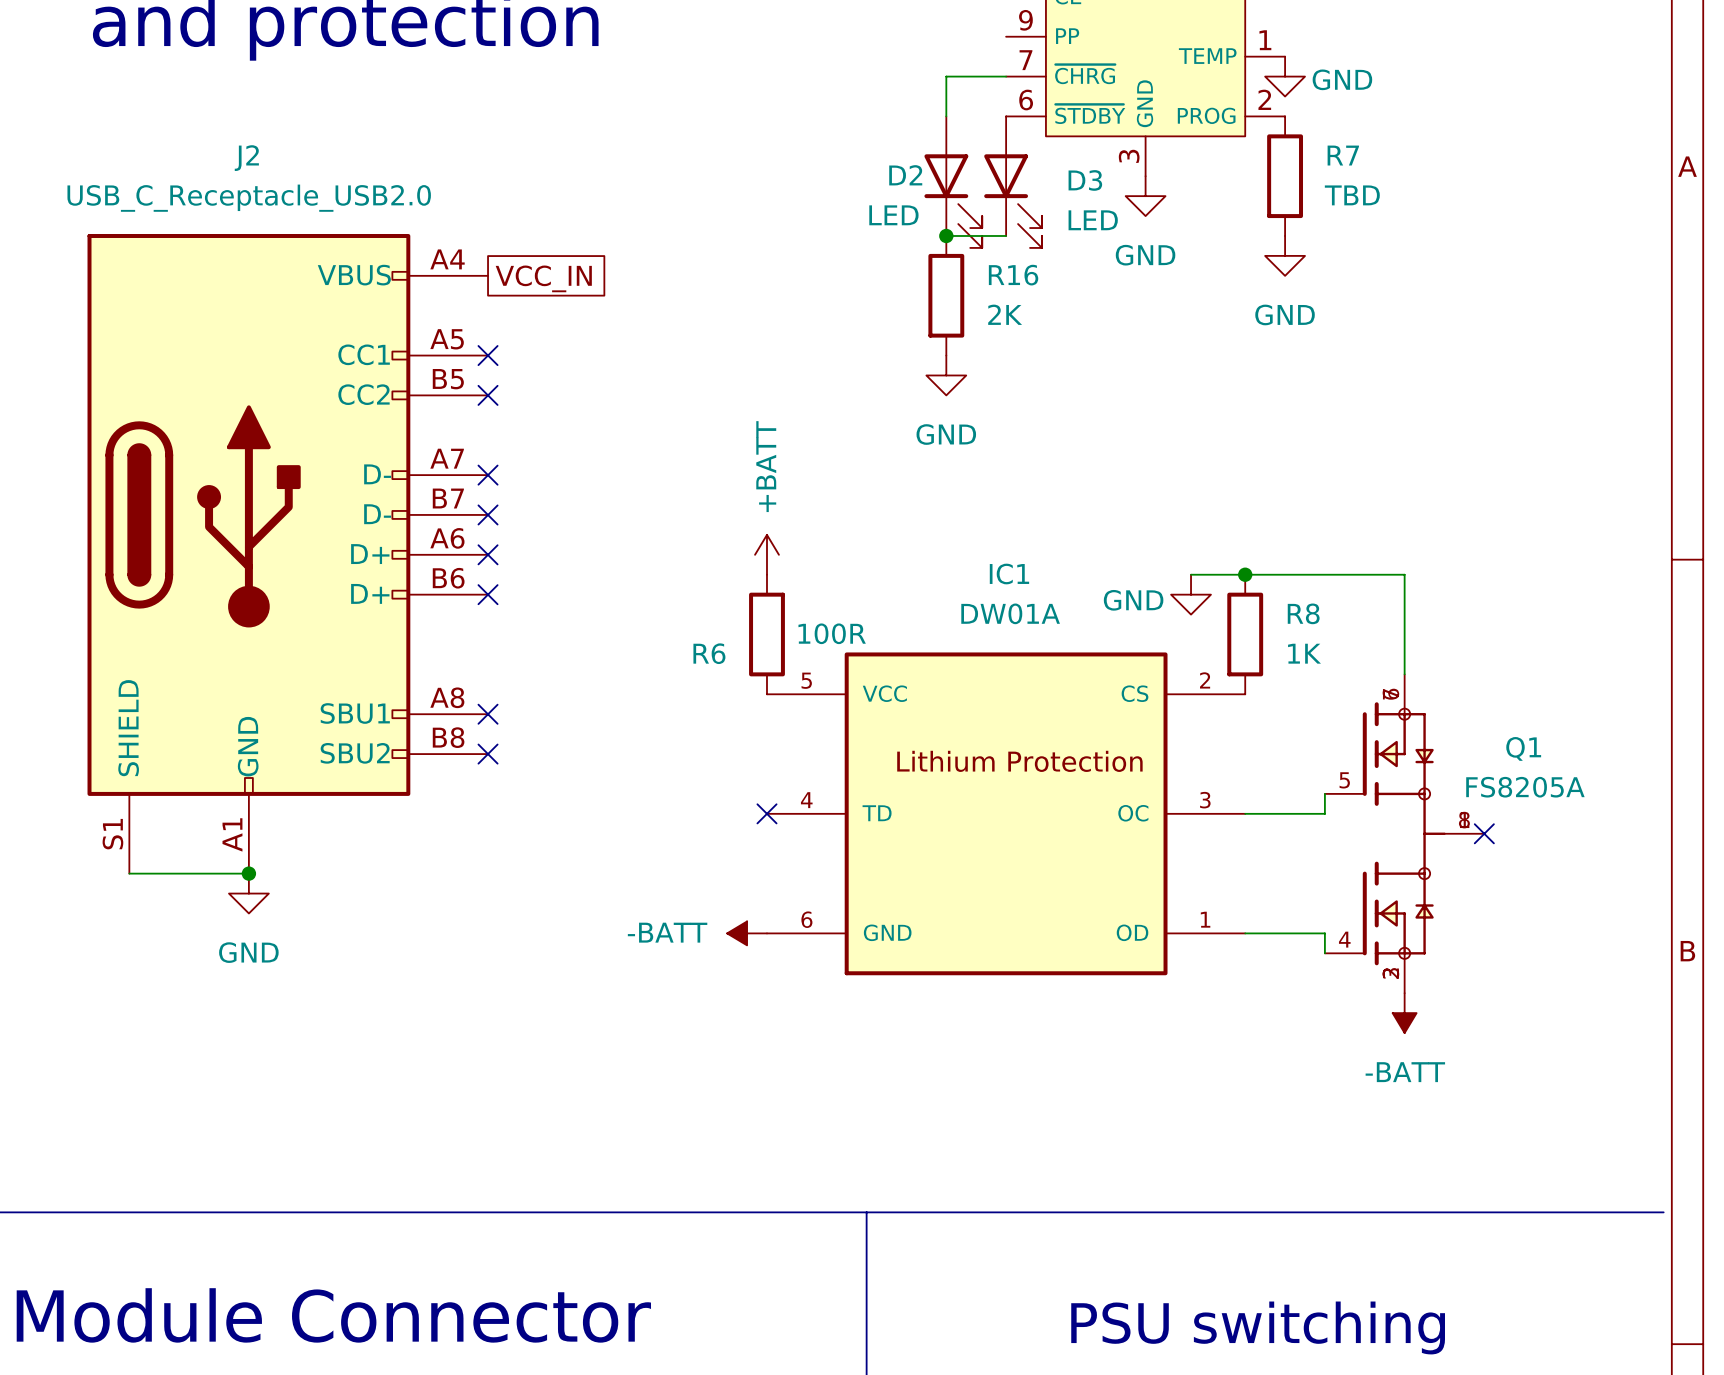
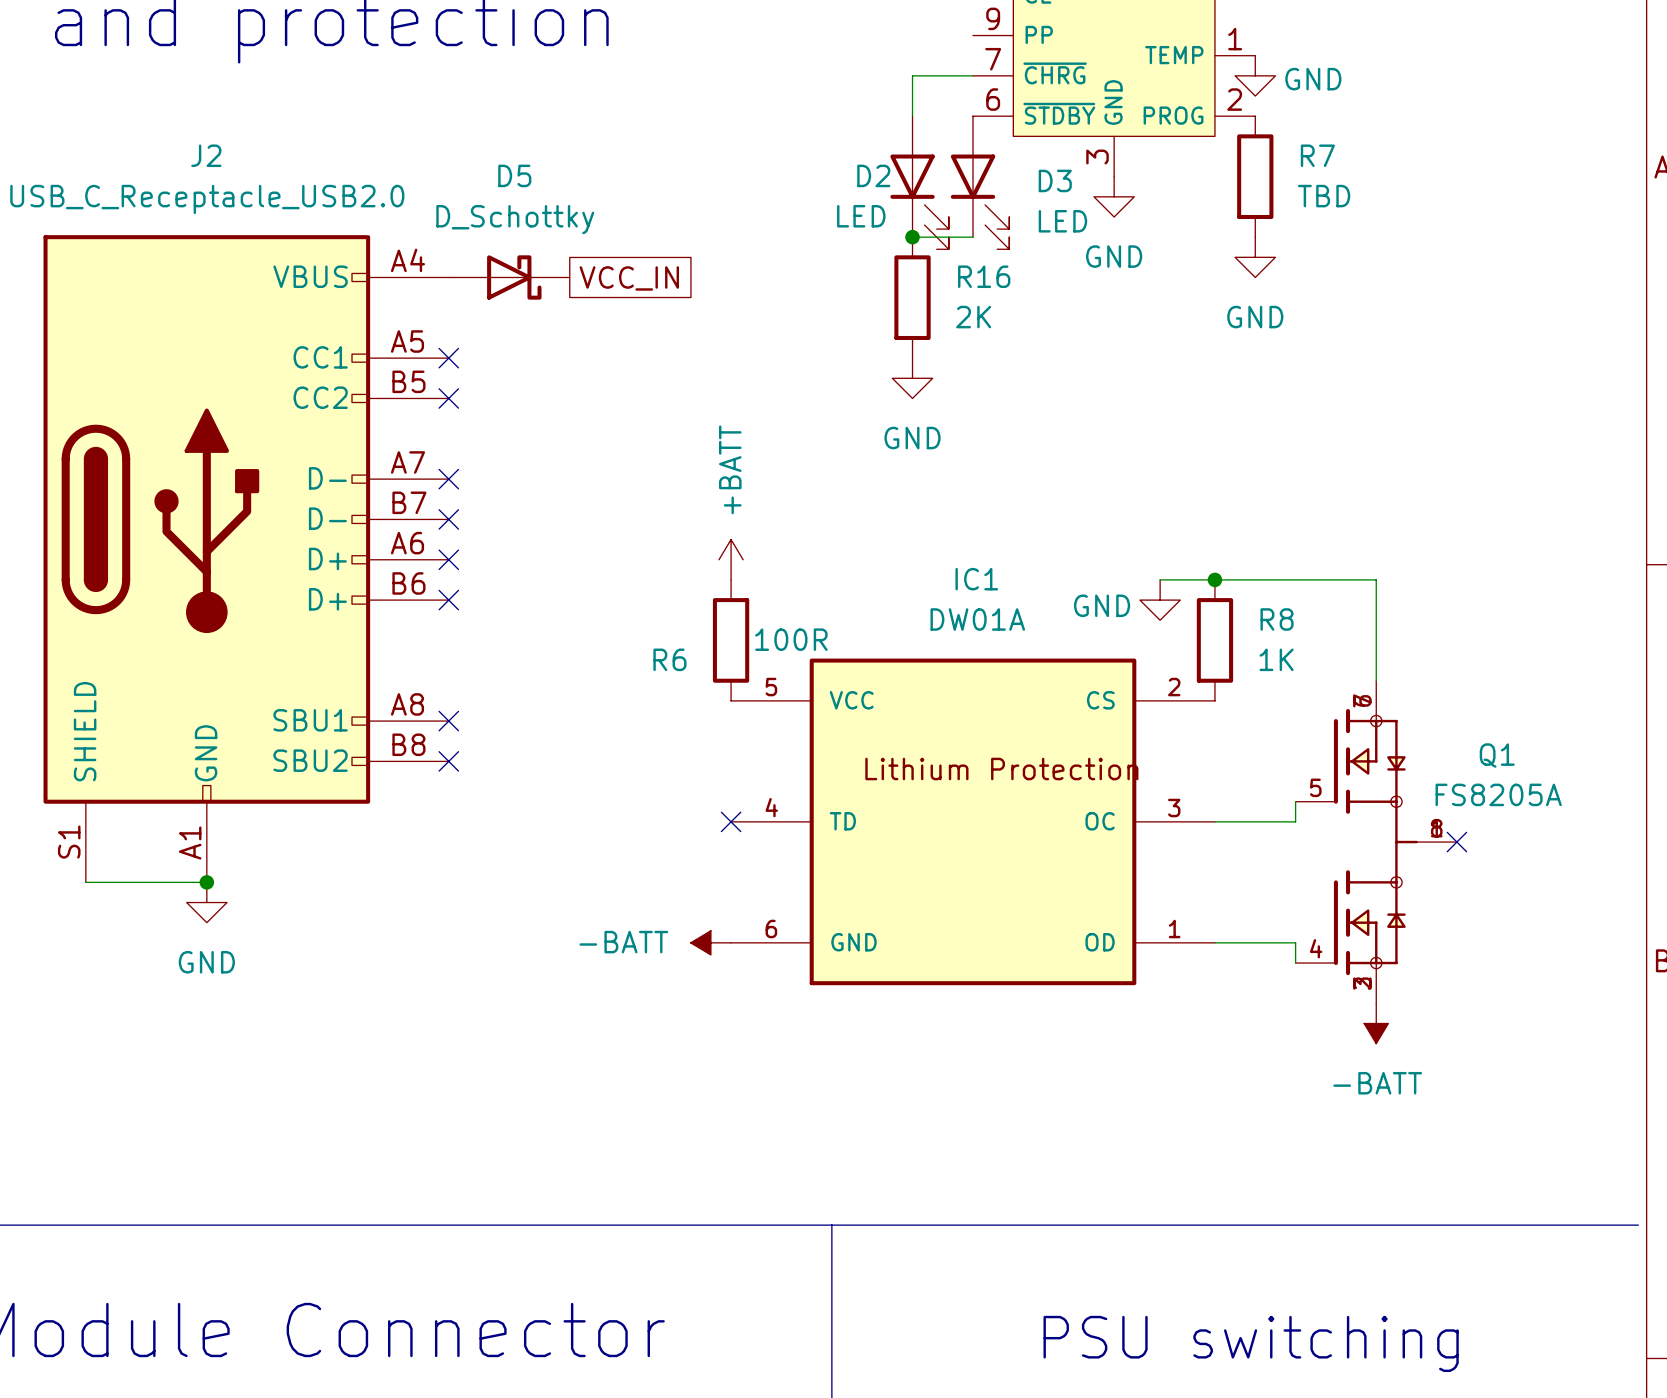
D5: none -> D_Schottky (509, 277)
global label position: VCC_IN (543, 278) -> VCC_IN (629, 278)

